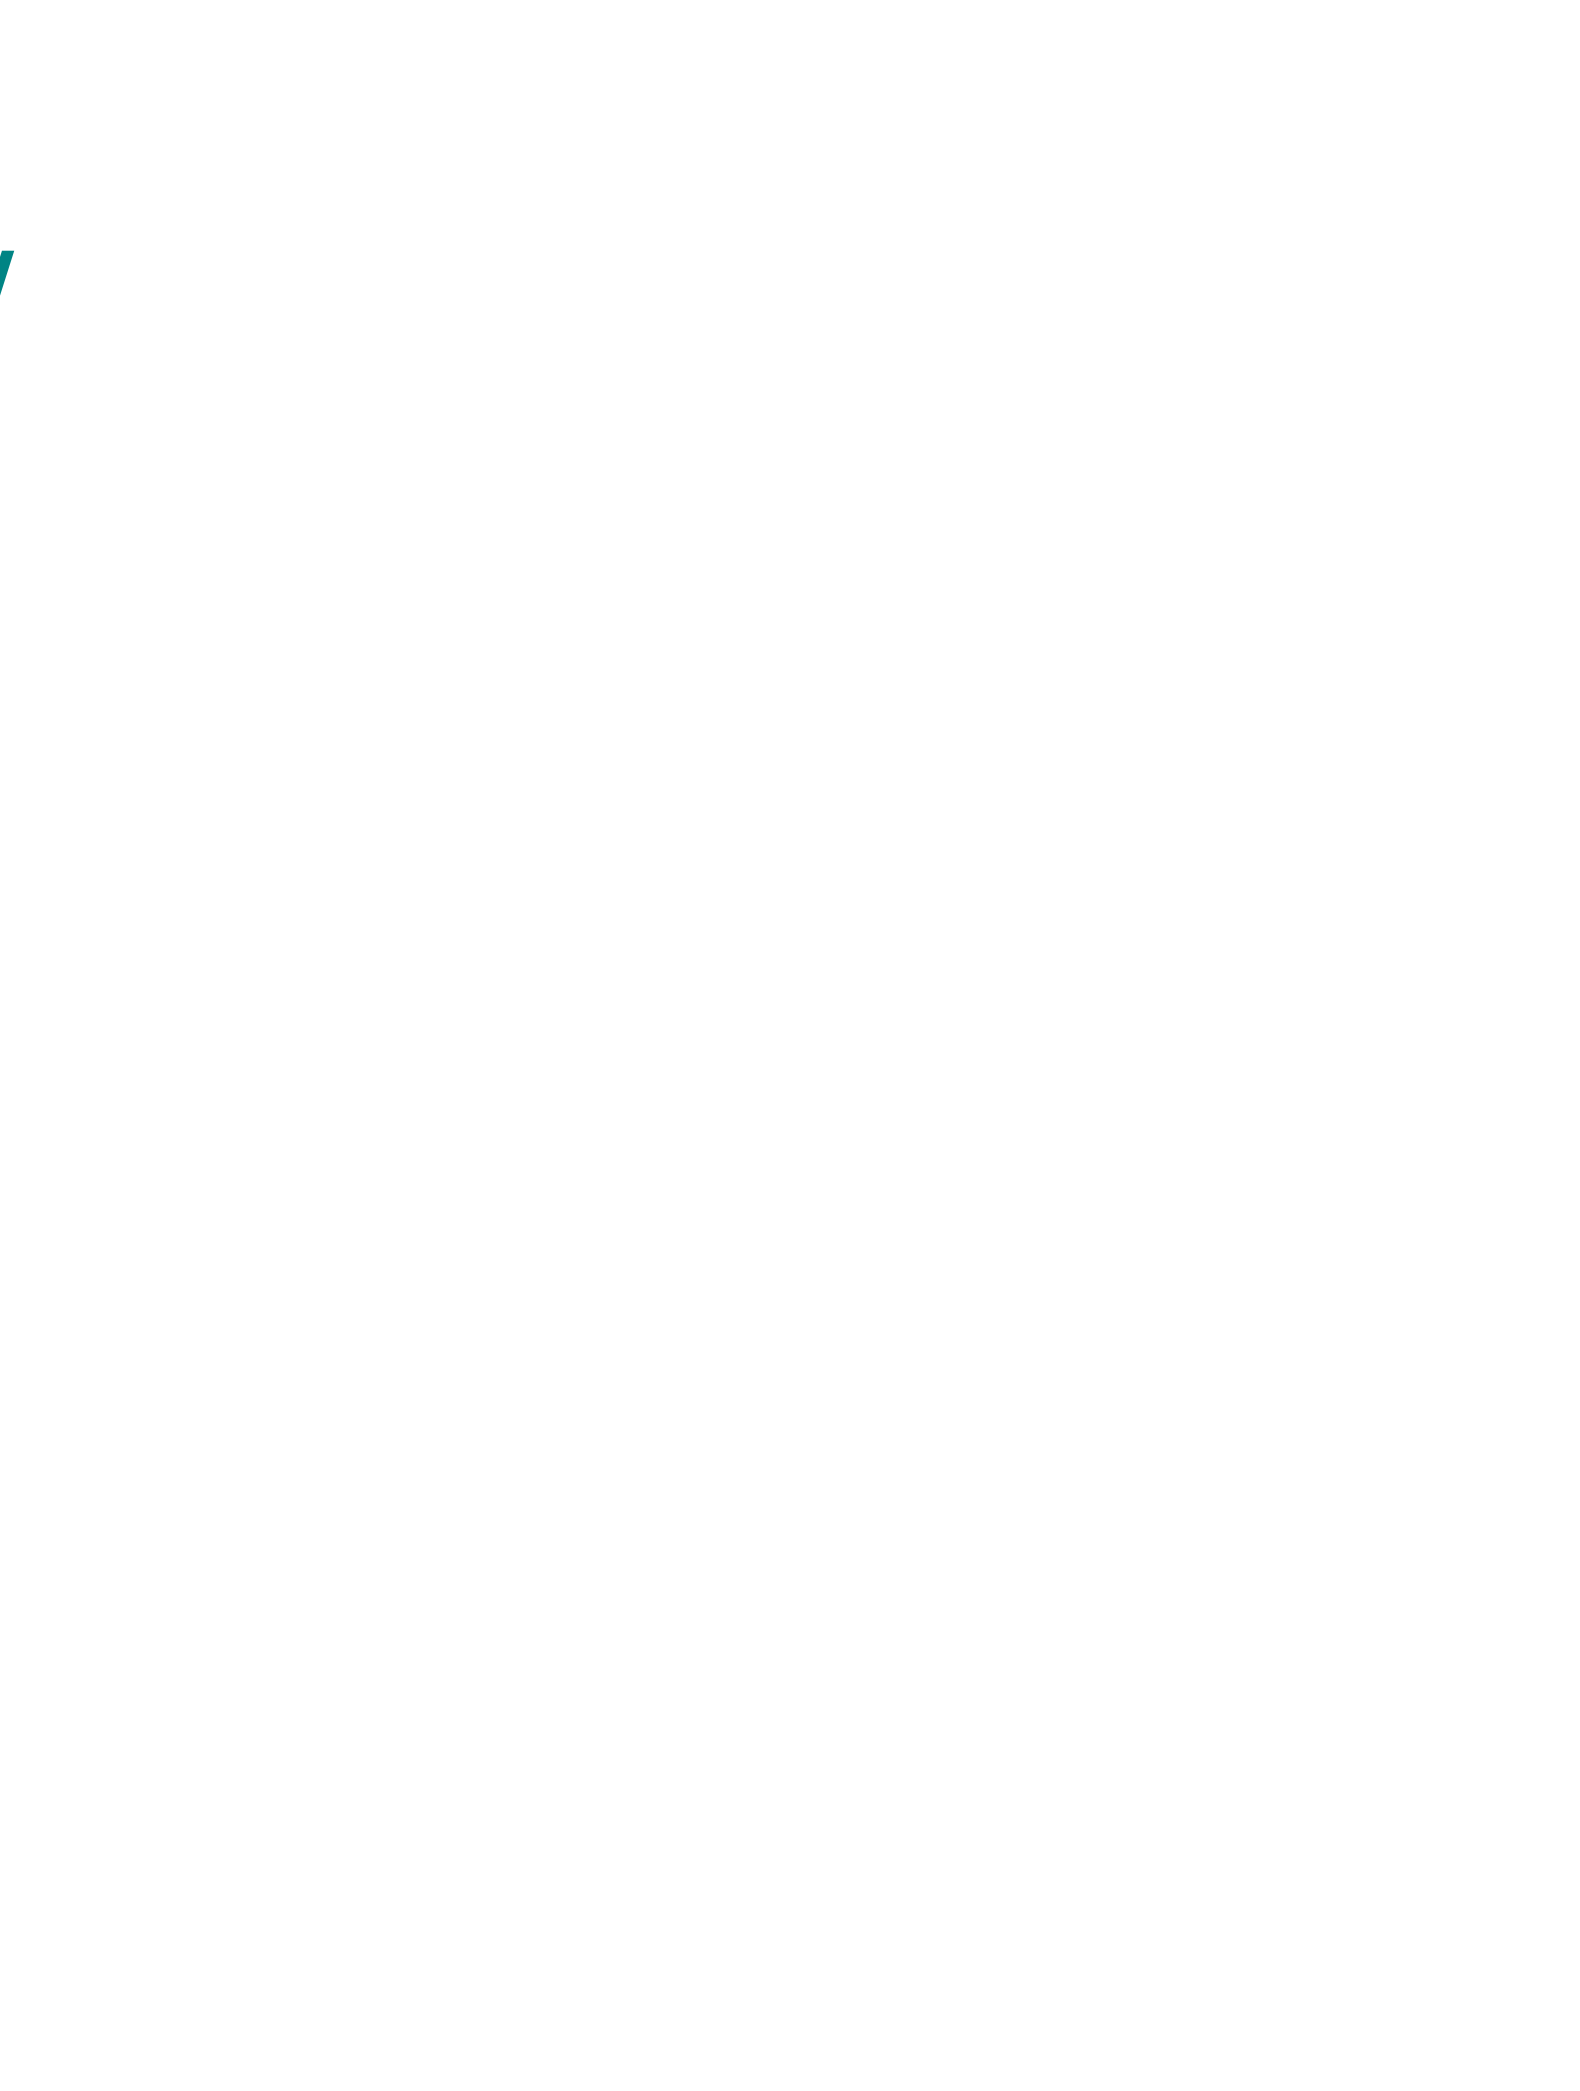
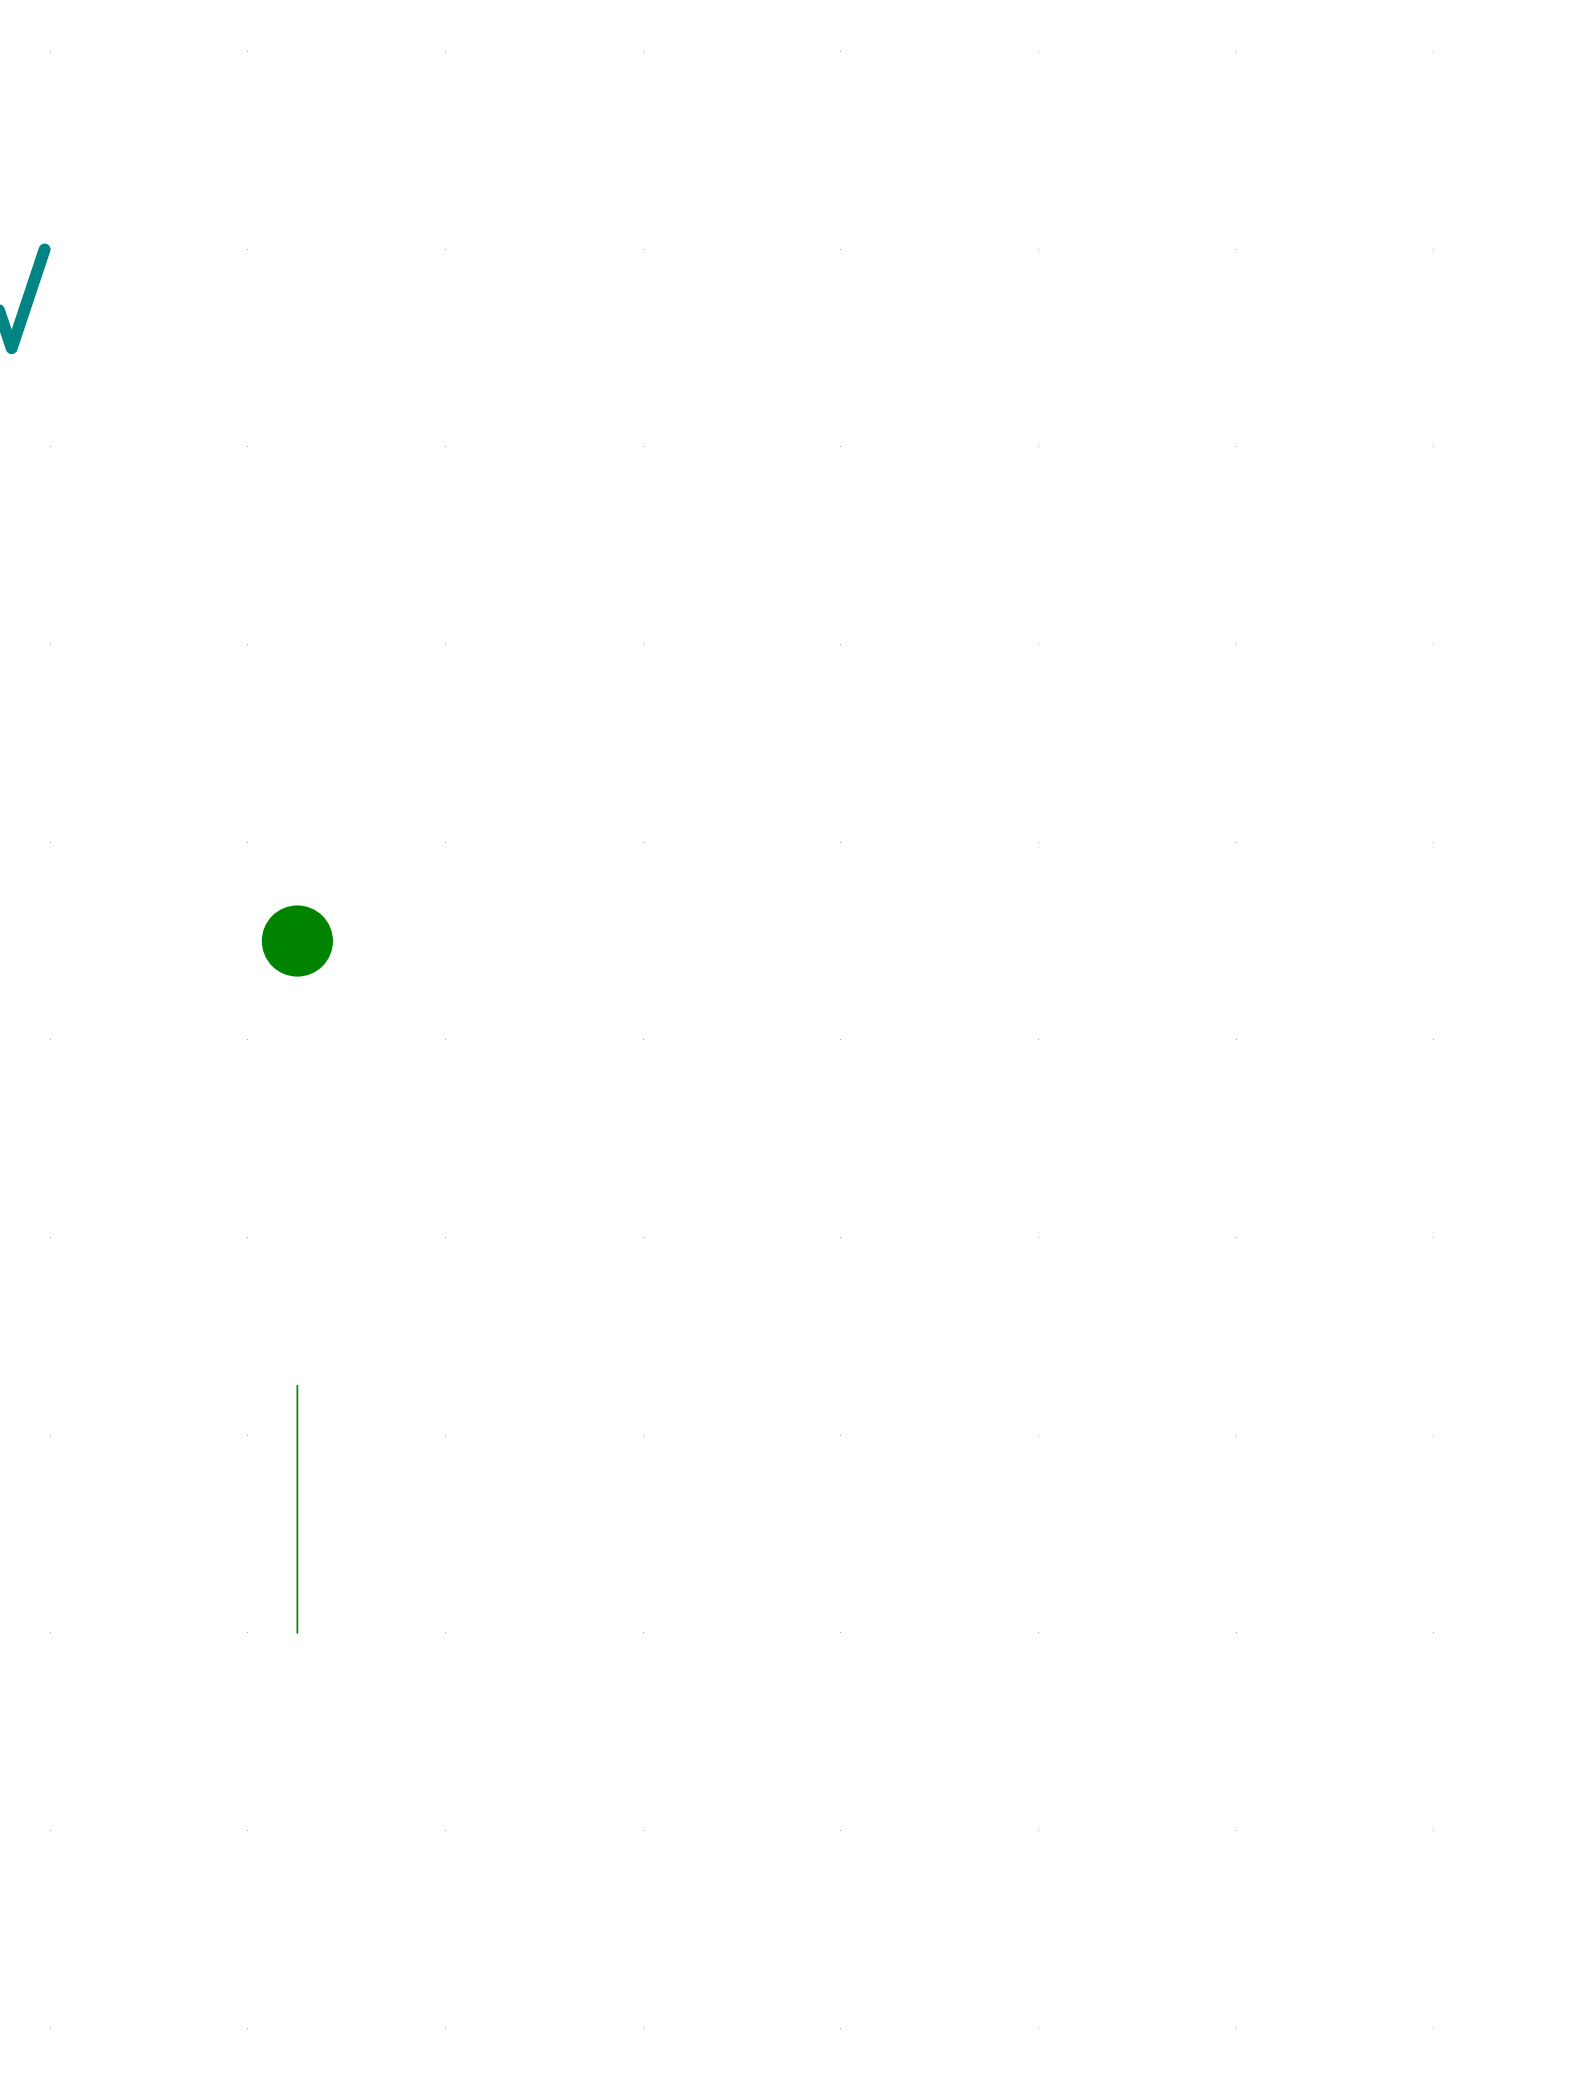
junction: none -> (297, 941)
wire: none -> (297, 1385) (297, 1632)

